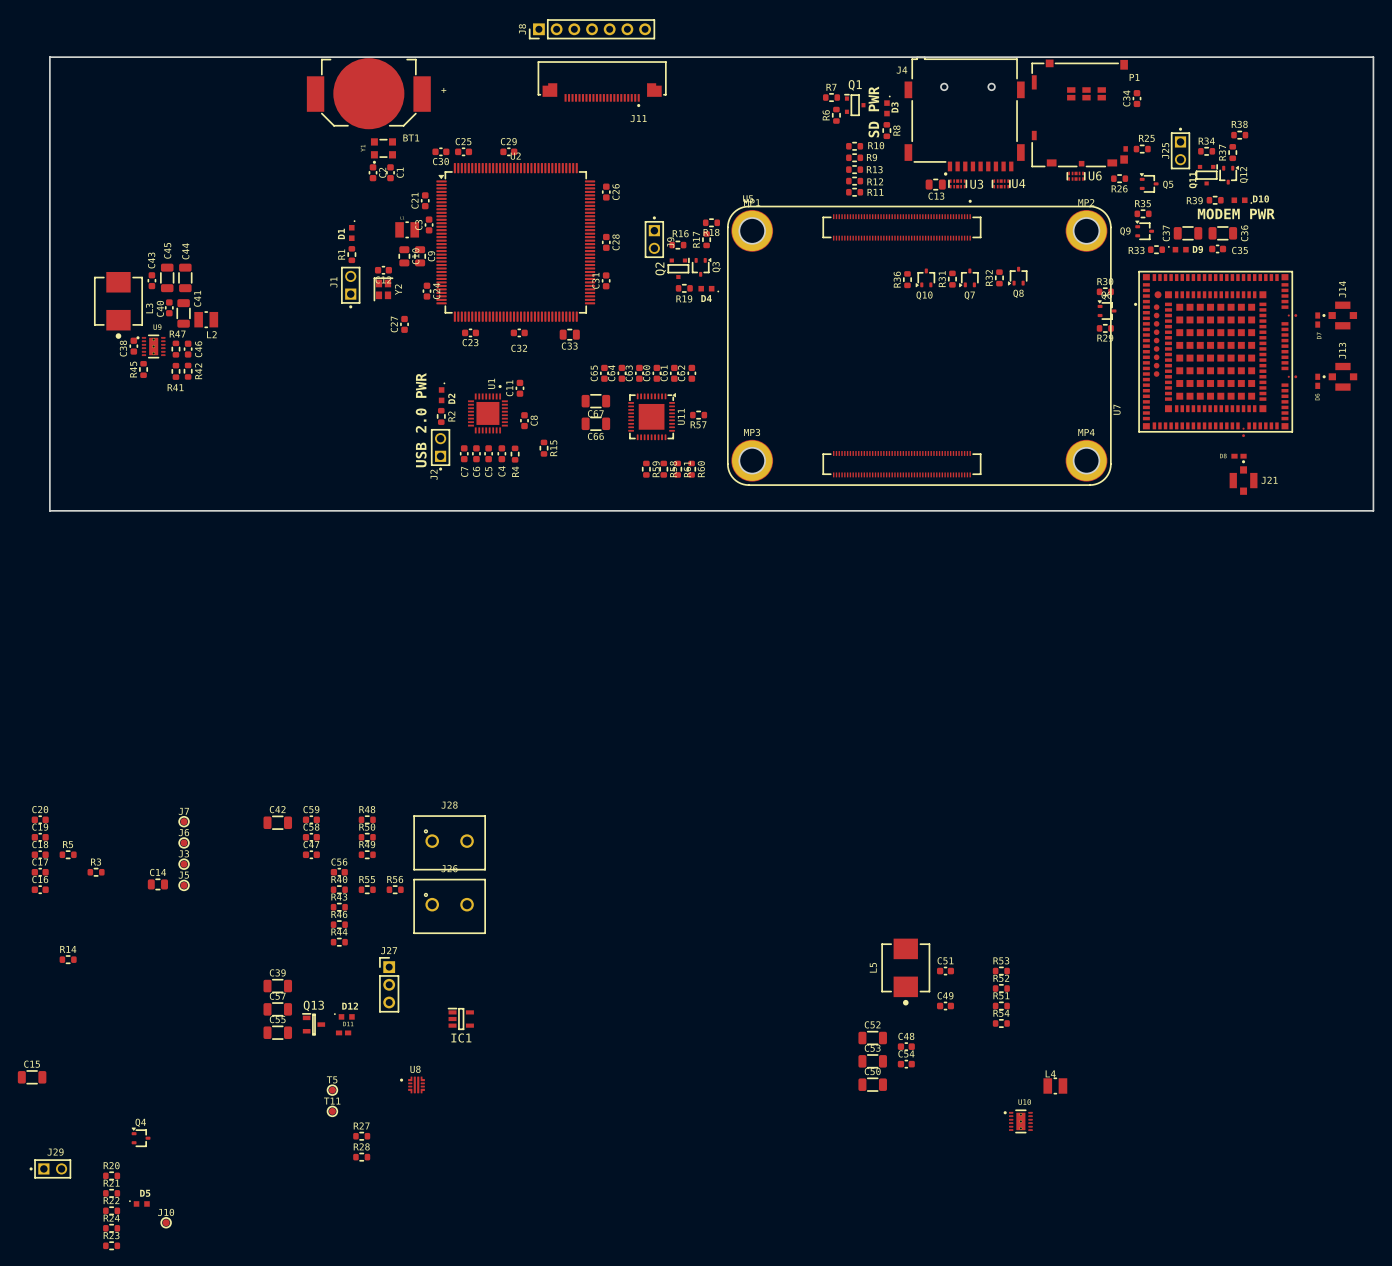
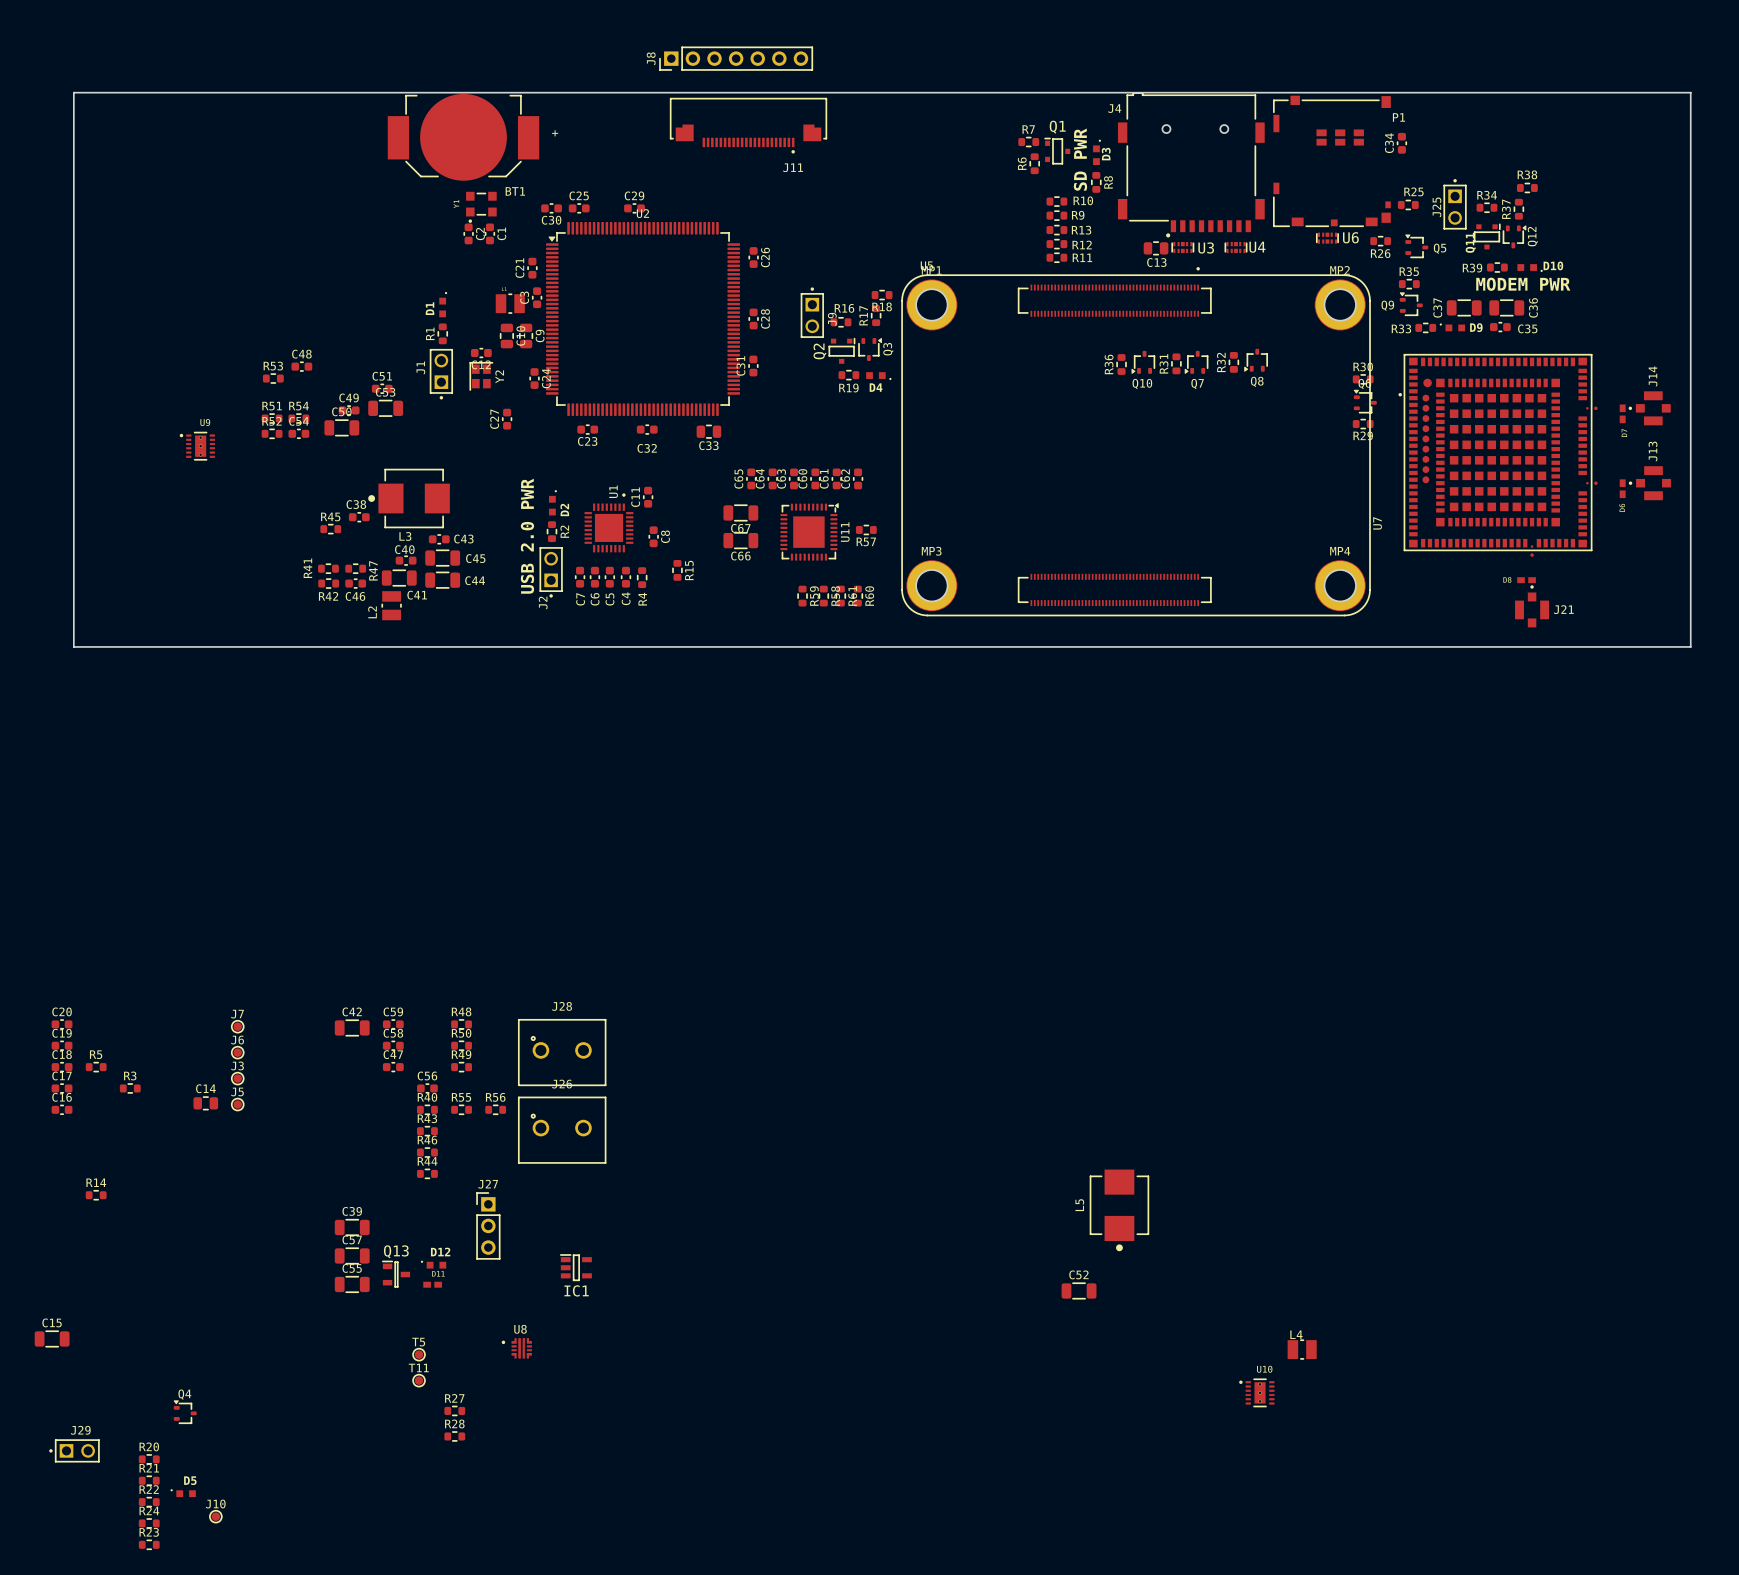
C45 rotation: 0° (167, 277) -> 90° clockwise (442, 558)
C45 position: (167, 277) -> (442, 558)
C44 rotation: 0° (185, 277) -> 90° clockwise (442, 580)
C44 position: (185, 277) -> (442, 580)
C43 rotation: 0° (151, 280) -> 90° clockwise (439, 539)
C43 position: (151, 280) -> (439, 539)
L3 rotation: 0° (118, 305) -> 90° clockwise (409, 498)
L3 position: (118, 305) -> (409, 498)
C40 rotation: 0° (169, 307) -> 90° clockwise (406, 560)
C40 position: (169, 307) -> (406, 560)
C41 rotation: 0° (183, 313) -> 90° clockwise (399, 578)
C41 position: (183, 313) -> (399, 578)
L2 rotation: 0° (206, 319) -> 90° clockwise (391, 605)
L2 position: (206, 319) -> (391, 605)
C38 rotation: 0° (133, 346) -> 90° clockwise (359, 517)
C38 position: (133, 346) -> (359, 517)
R47 rotation: 0° (175, 349) -> 90° clockwise (355, 568)
R47 position: (175, 349) -> (355, 568)
C46 rotation: 0° (188, 349) -> 90° clockwise (355, 583)
C46 position: (188, 349) -> (355, 583)
R45 rotation: 0° (143, 369) -> 90° clockwise (330, 529)
R45 position: (143, 369) -> (330, 529)
R41 rotation: 0° (175, 371) -> 90° clockwise (328, 568)
R41 position: (175, 371) -> (328, 568)
R42 rotation: 0° (188, 371) -> 90° clockwise (328, 583)
R42 position: (188, 371) -> (328, 583)
C51 position: (945, 971) -> (382, 388)
R53 position: (1001, 971) -> (273, 378)
R52 position: (1001, 988) -> (272, 433)
C49 position: (945, 1006) -> (349, 410)
R51 position: (1001, 1006) -> (272, 418)
R54 position: (1001, 1023) -> (298, 418)
C48 position: (906, 1046) -> (301, 366)
C53 position: (872, 1061) -> (385, 408)
C54 position: (906, 1064) -> (298, 433)
C50 position: (872, 1084) -> (341, 427)

